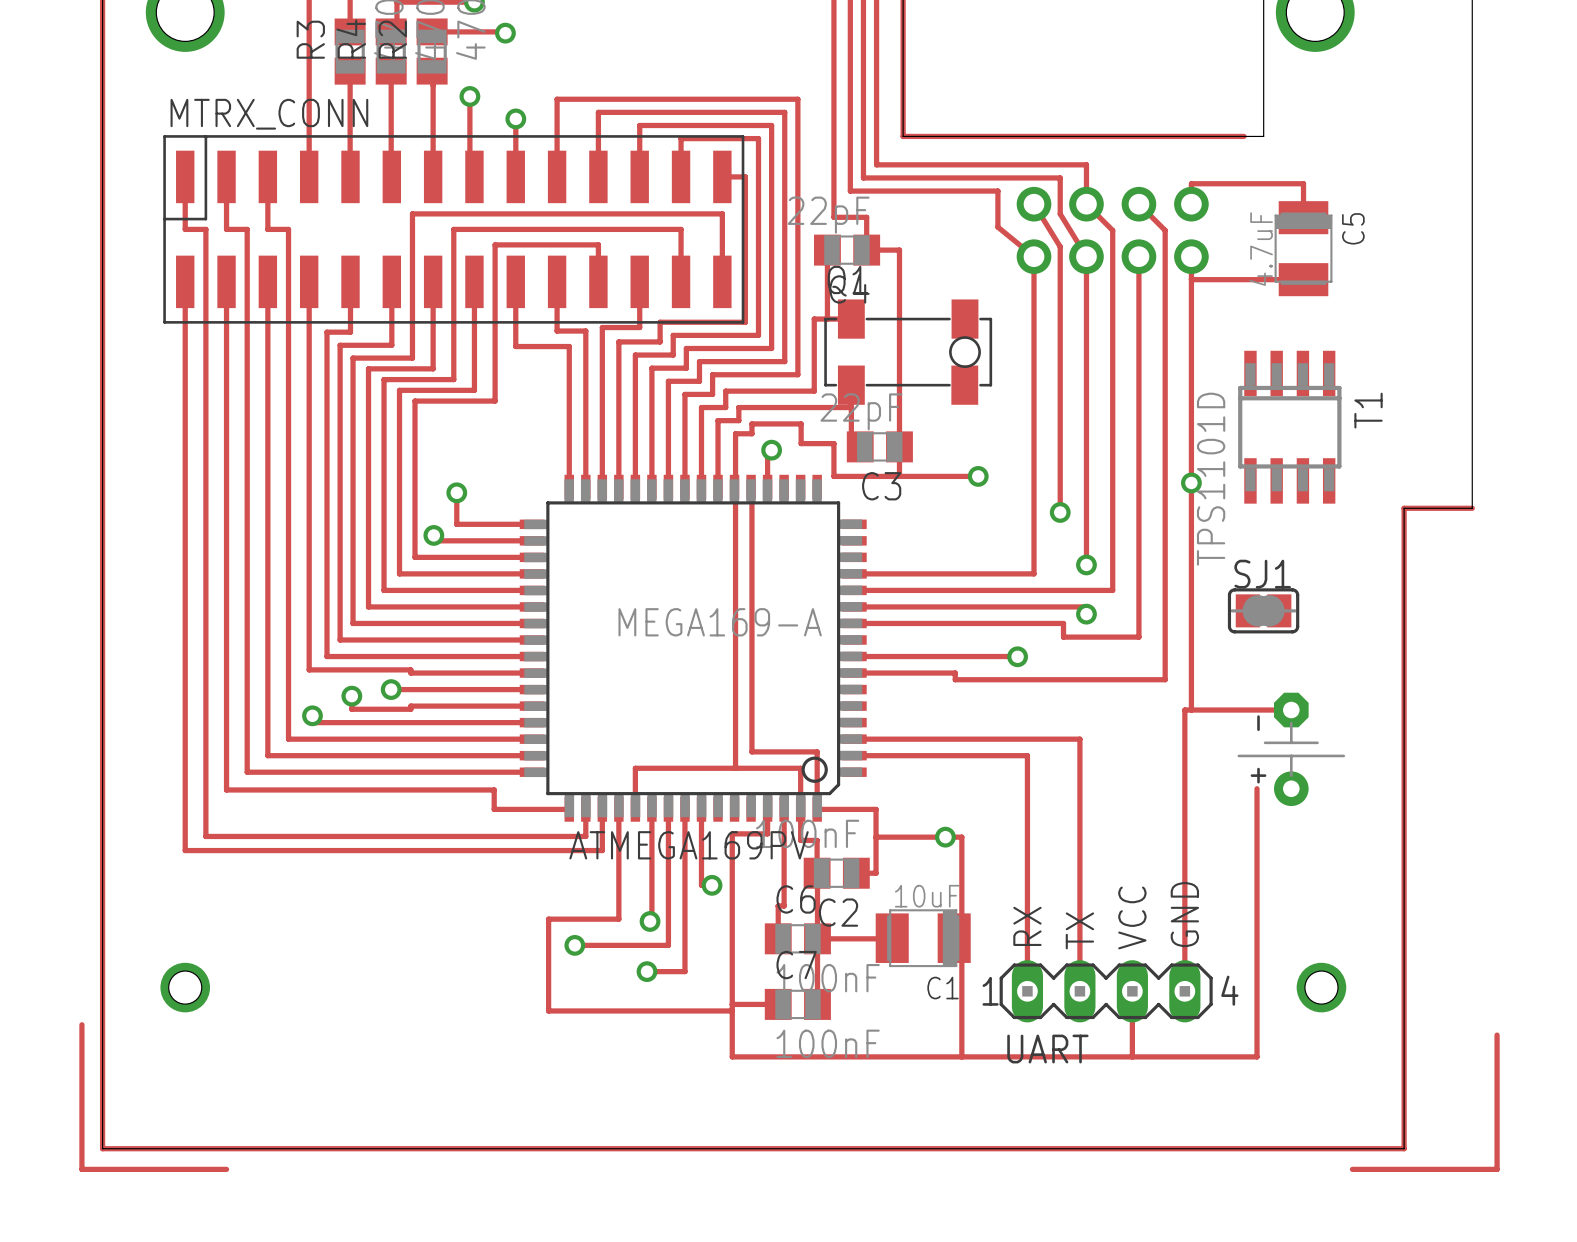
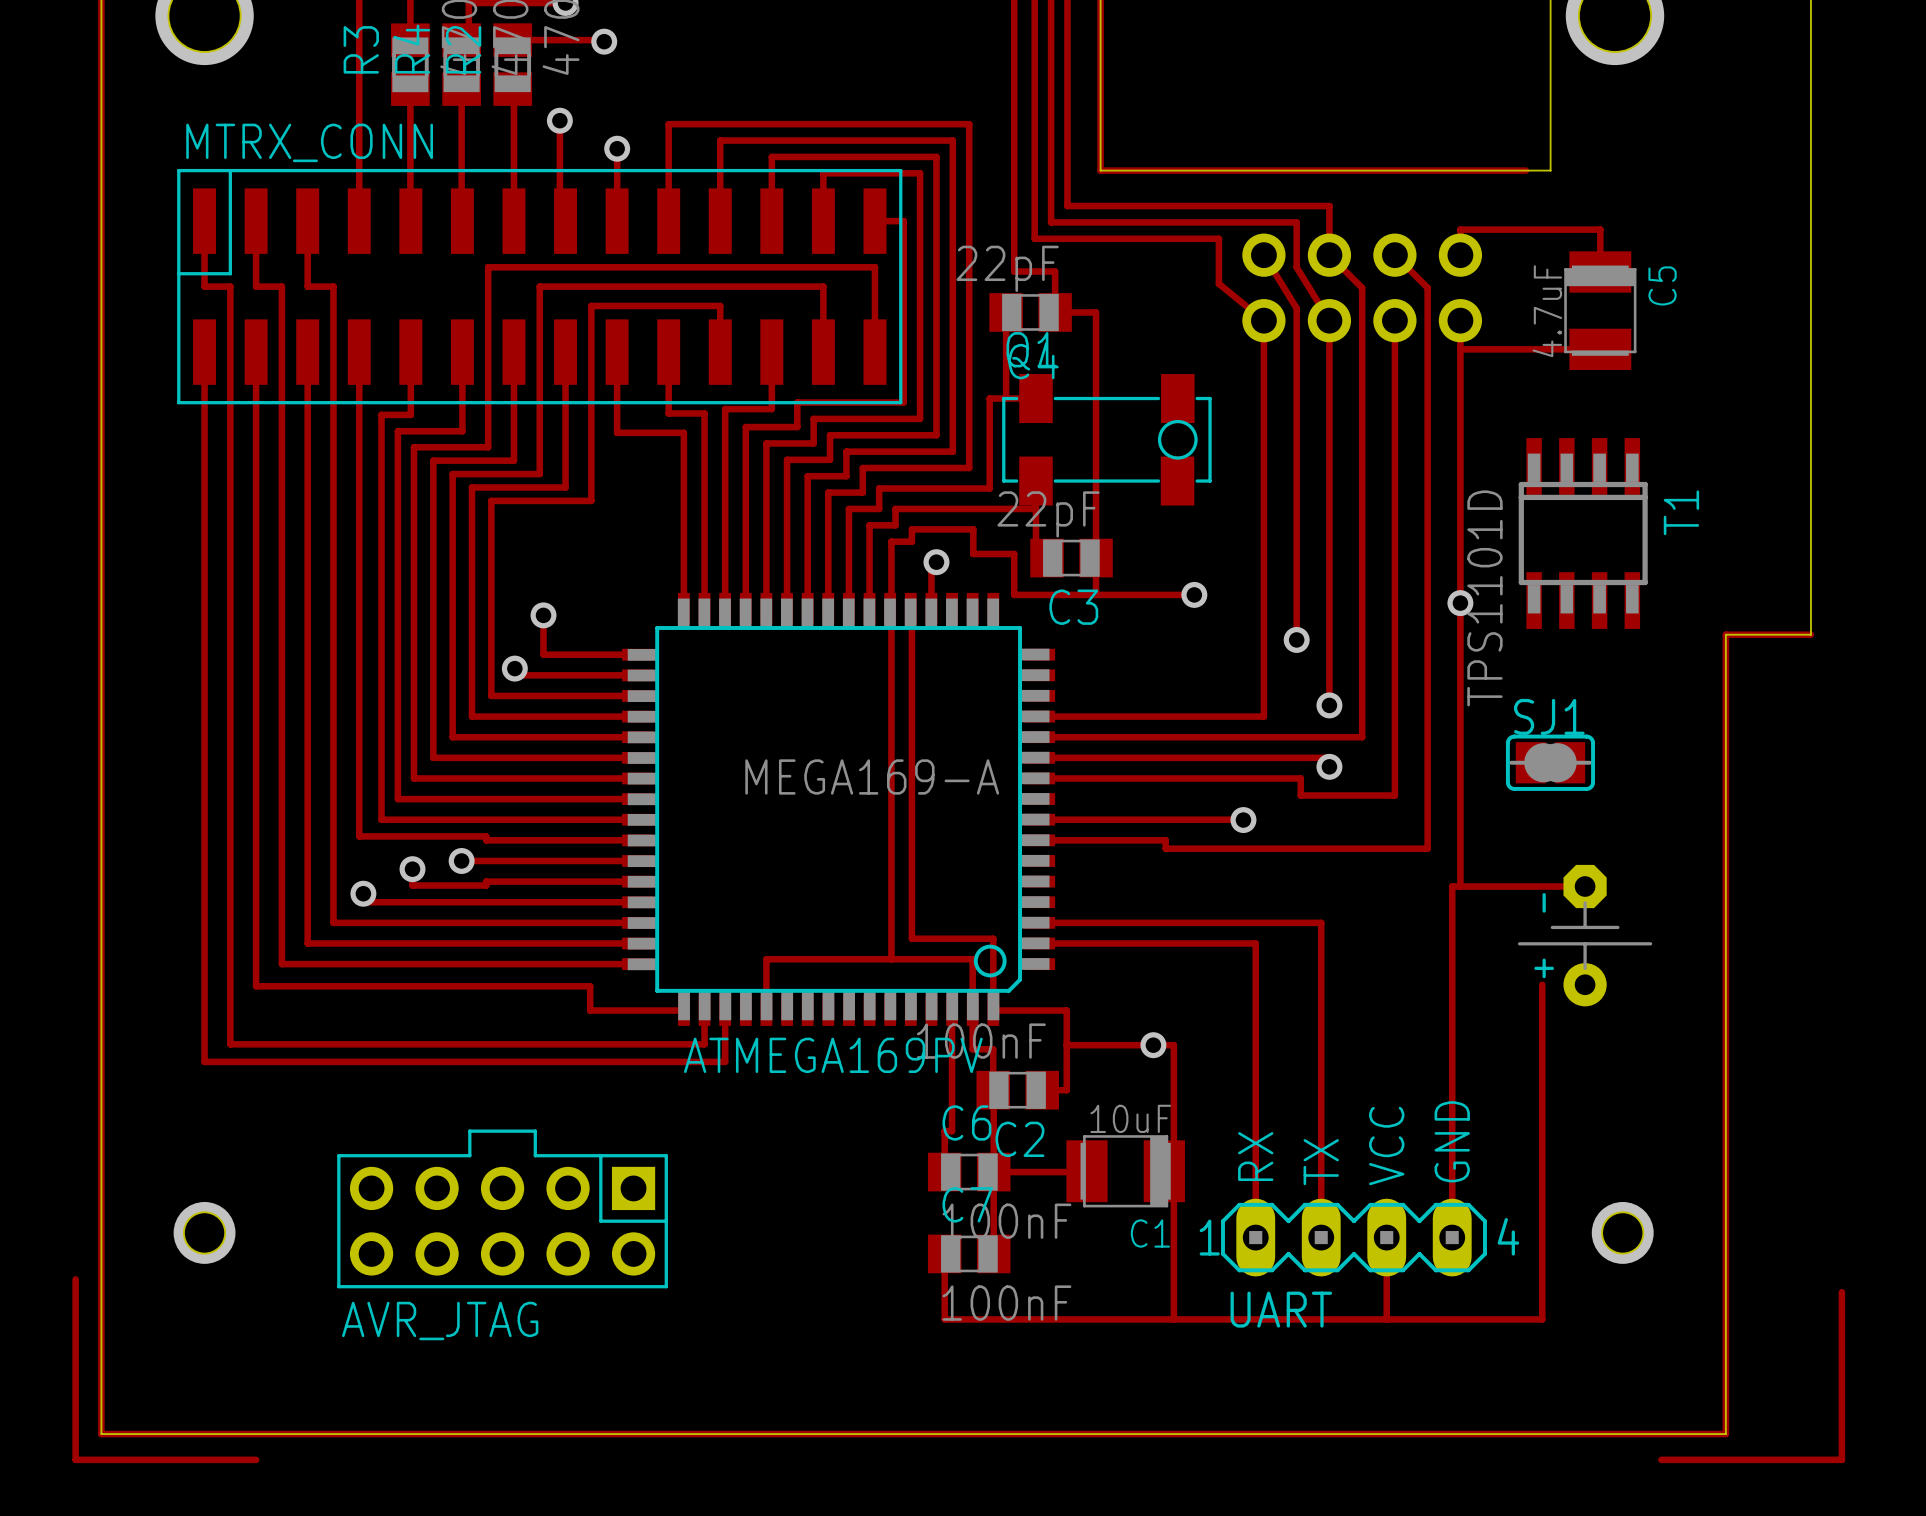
track: (618, 809) (618, 919) (548, 919) (548, 1010) (732, 1010) -> none
track: (651, 809) (651, 921) (650, 921) -> none
track: (668, 809) (668, 945) (574, 945) -> none
track: (684, 809) (684, 971) (647, 971) -> none
track: (701, 809) (701, 885) (712, 885) -> none
track: (767, 809) (767, 833) (732, 833) (732, 1056) (778, 1056) -> none
via: (712, 885) -> none
via: (650, 921) -> none
via: (574, 945) -> none
AVR_JTAG: none -> (502, 1208)
via: (647, 971) -> none
track: (732, 1004) (778, 1004) -> (944, 1319) (944, 1253)

